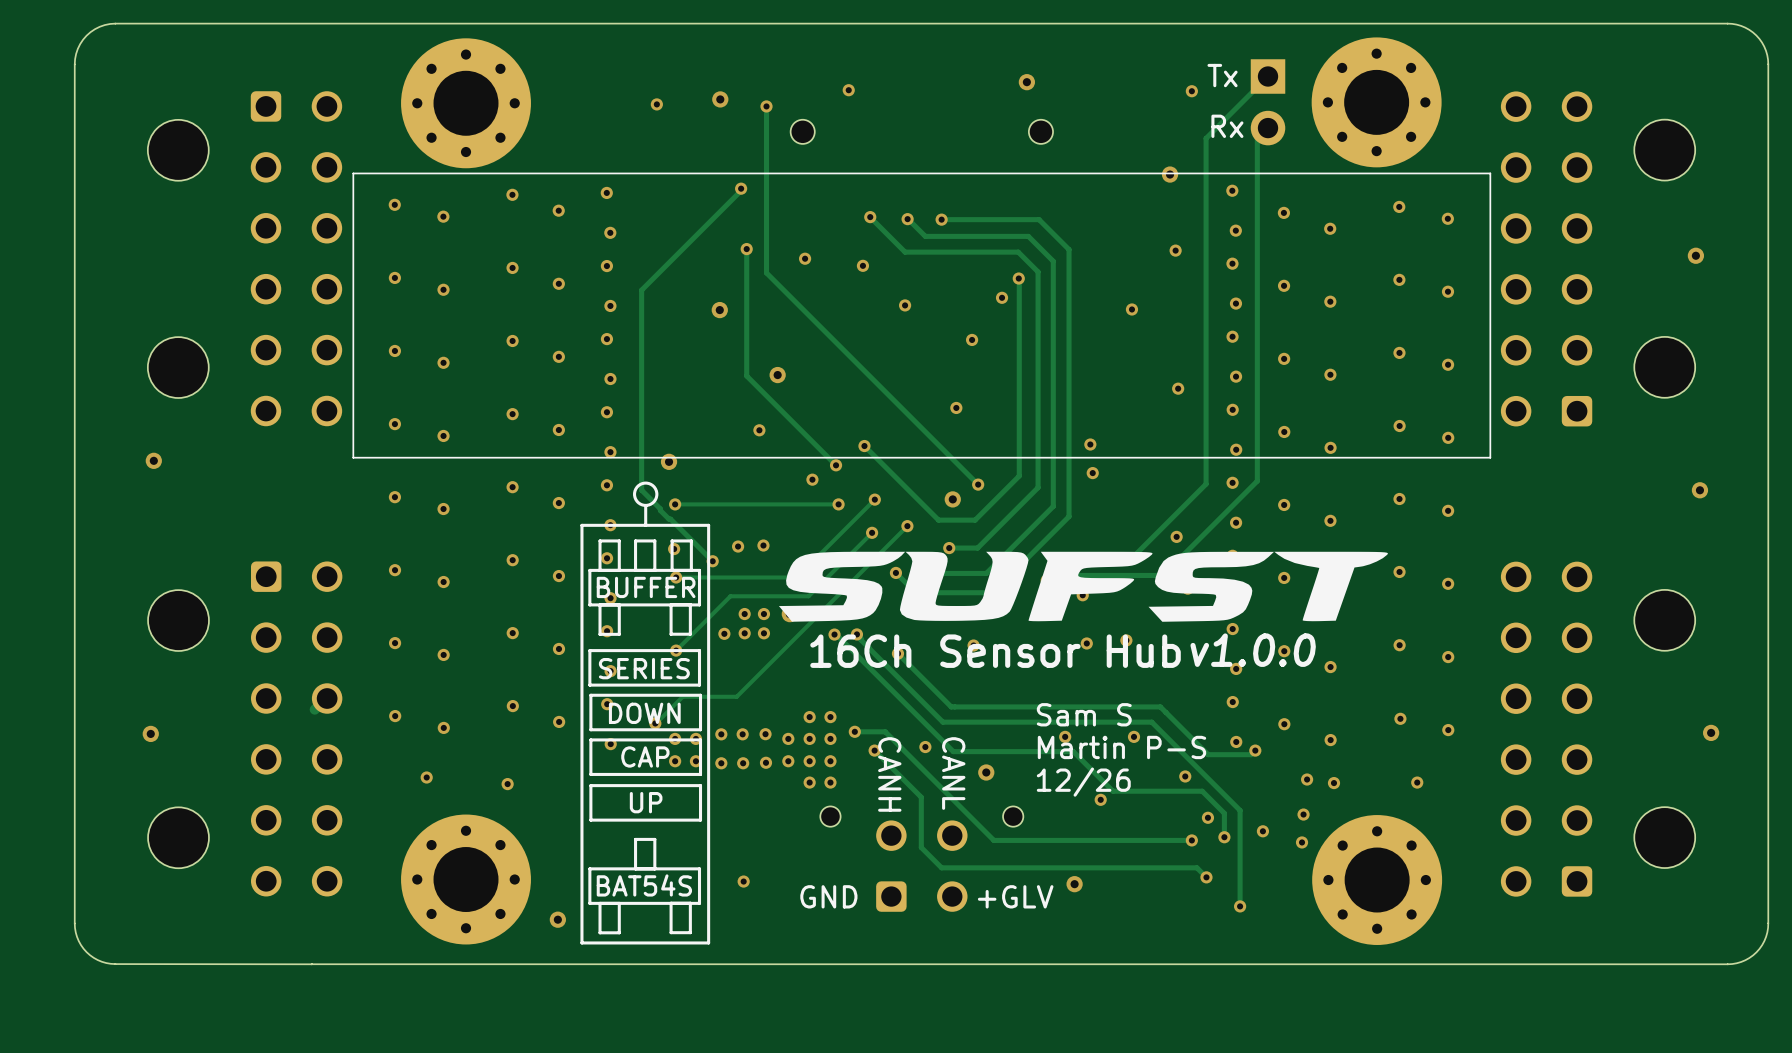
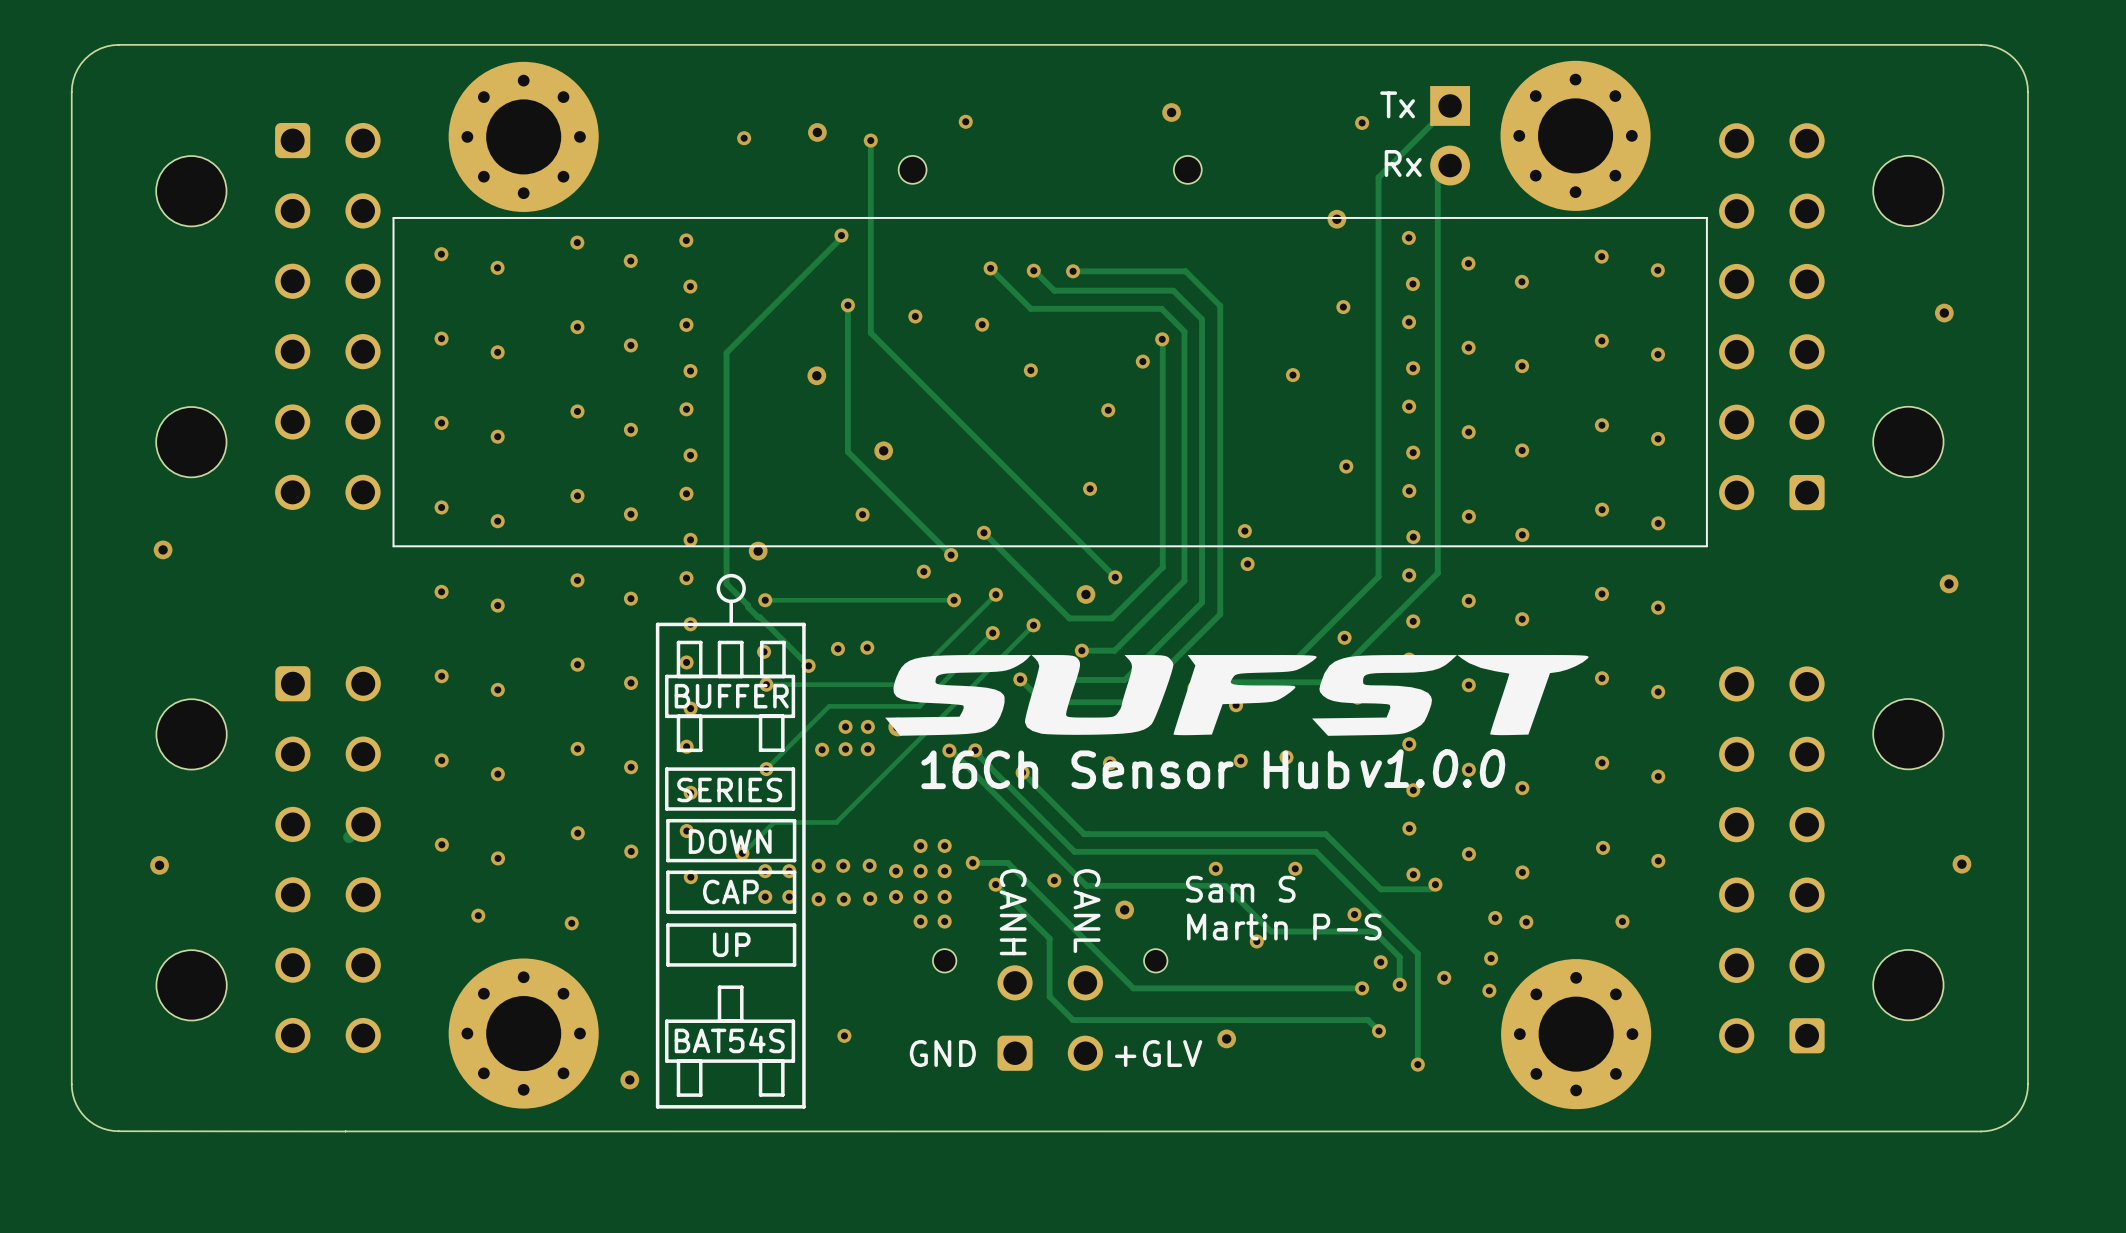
text: Sam S (1084, 714) -> none
text: Martin P-S (1121, 747) -> Sam S (1240, 889)
text: 12/26 (1083, 782) -> Martin P-S (1284, 926)

